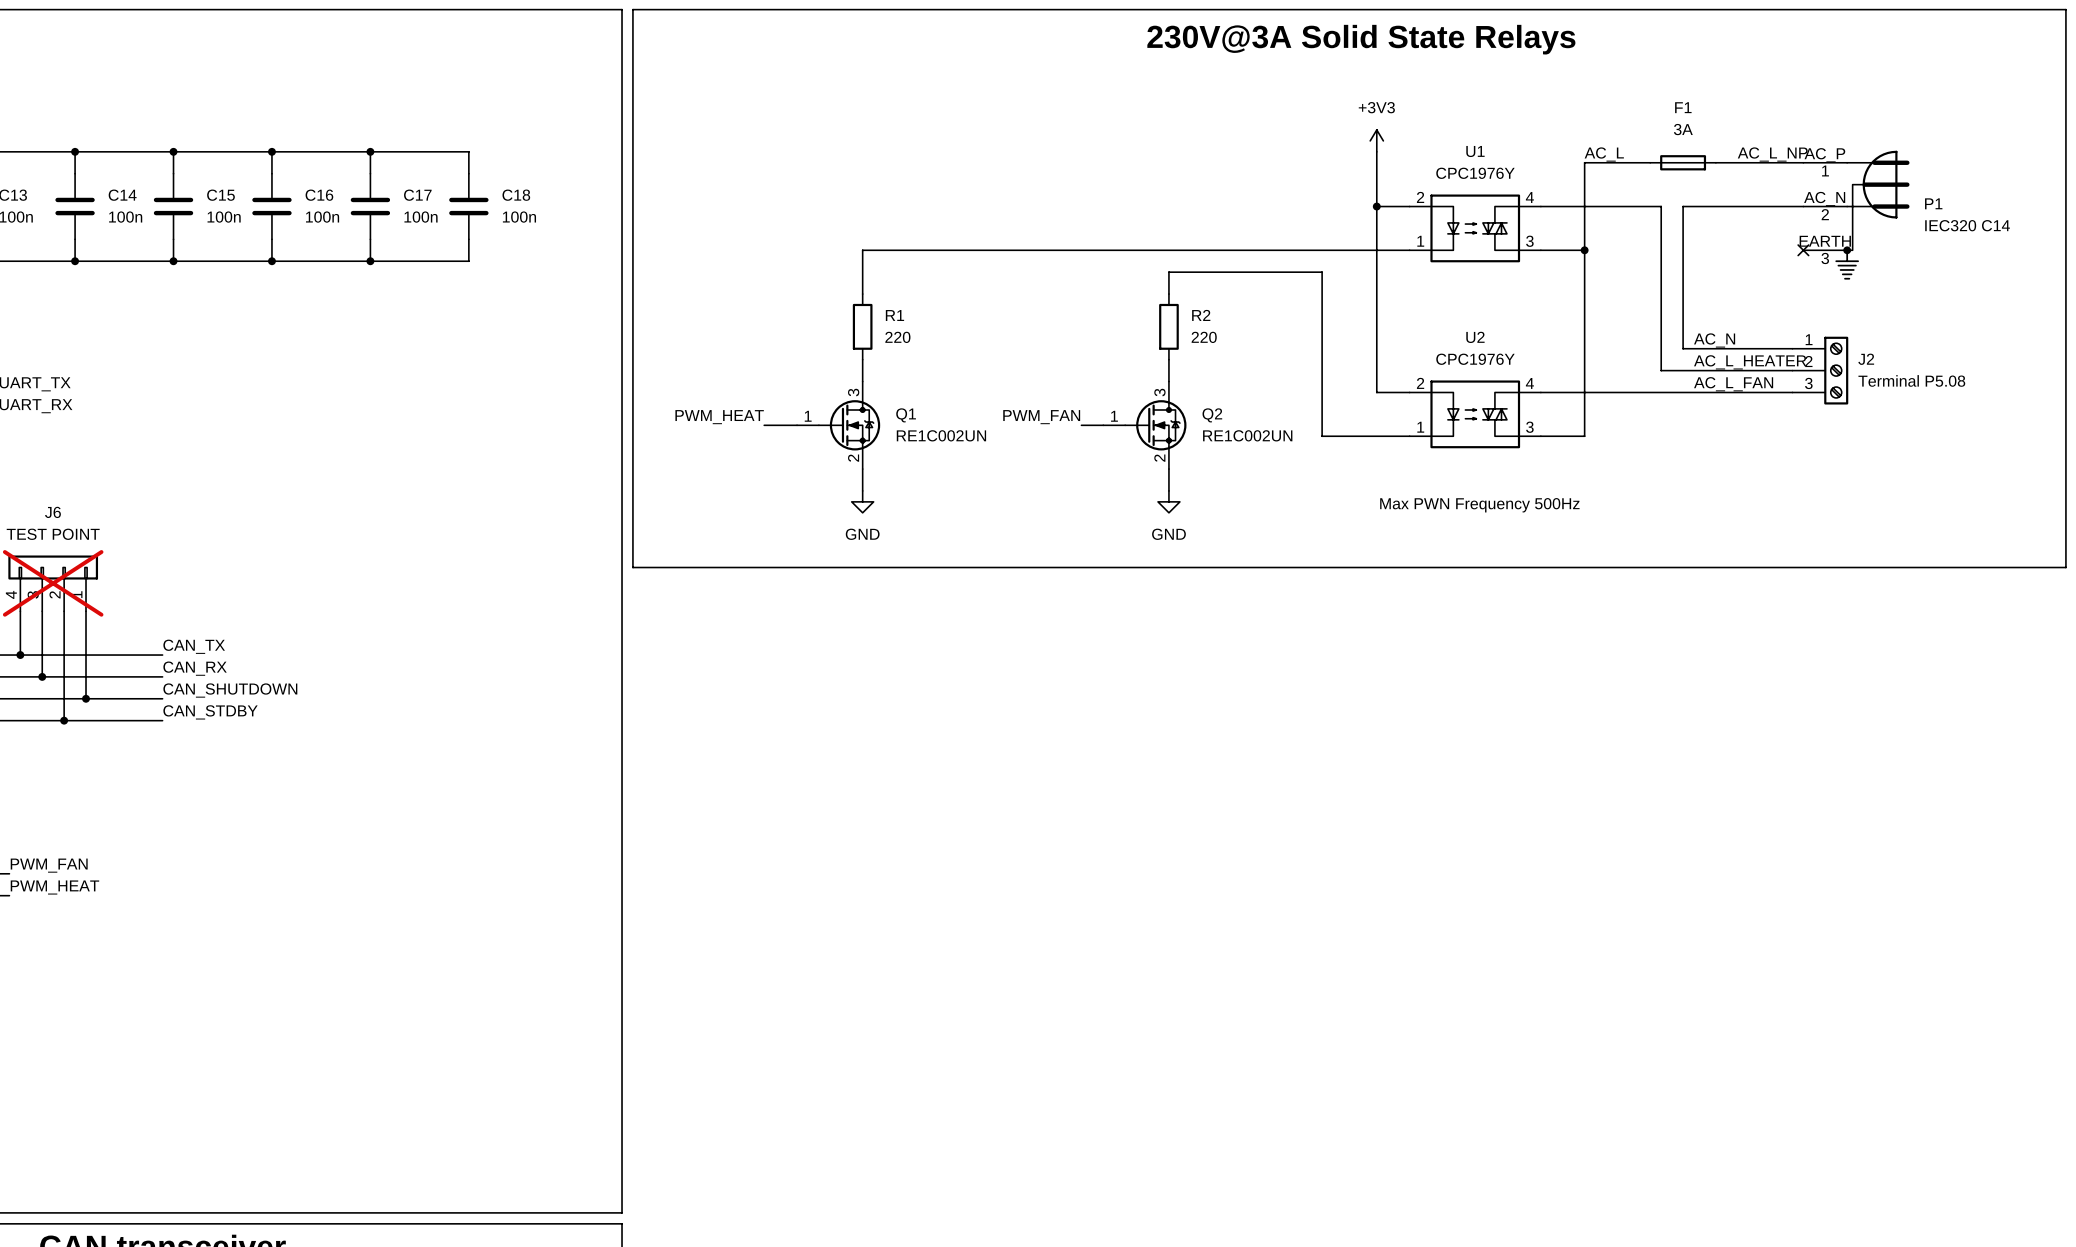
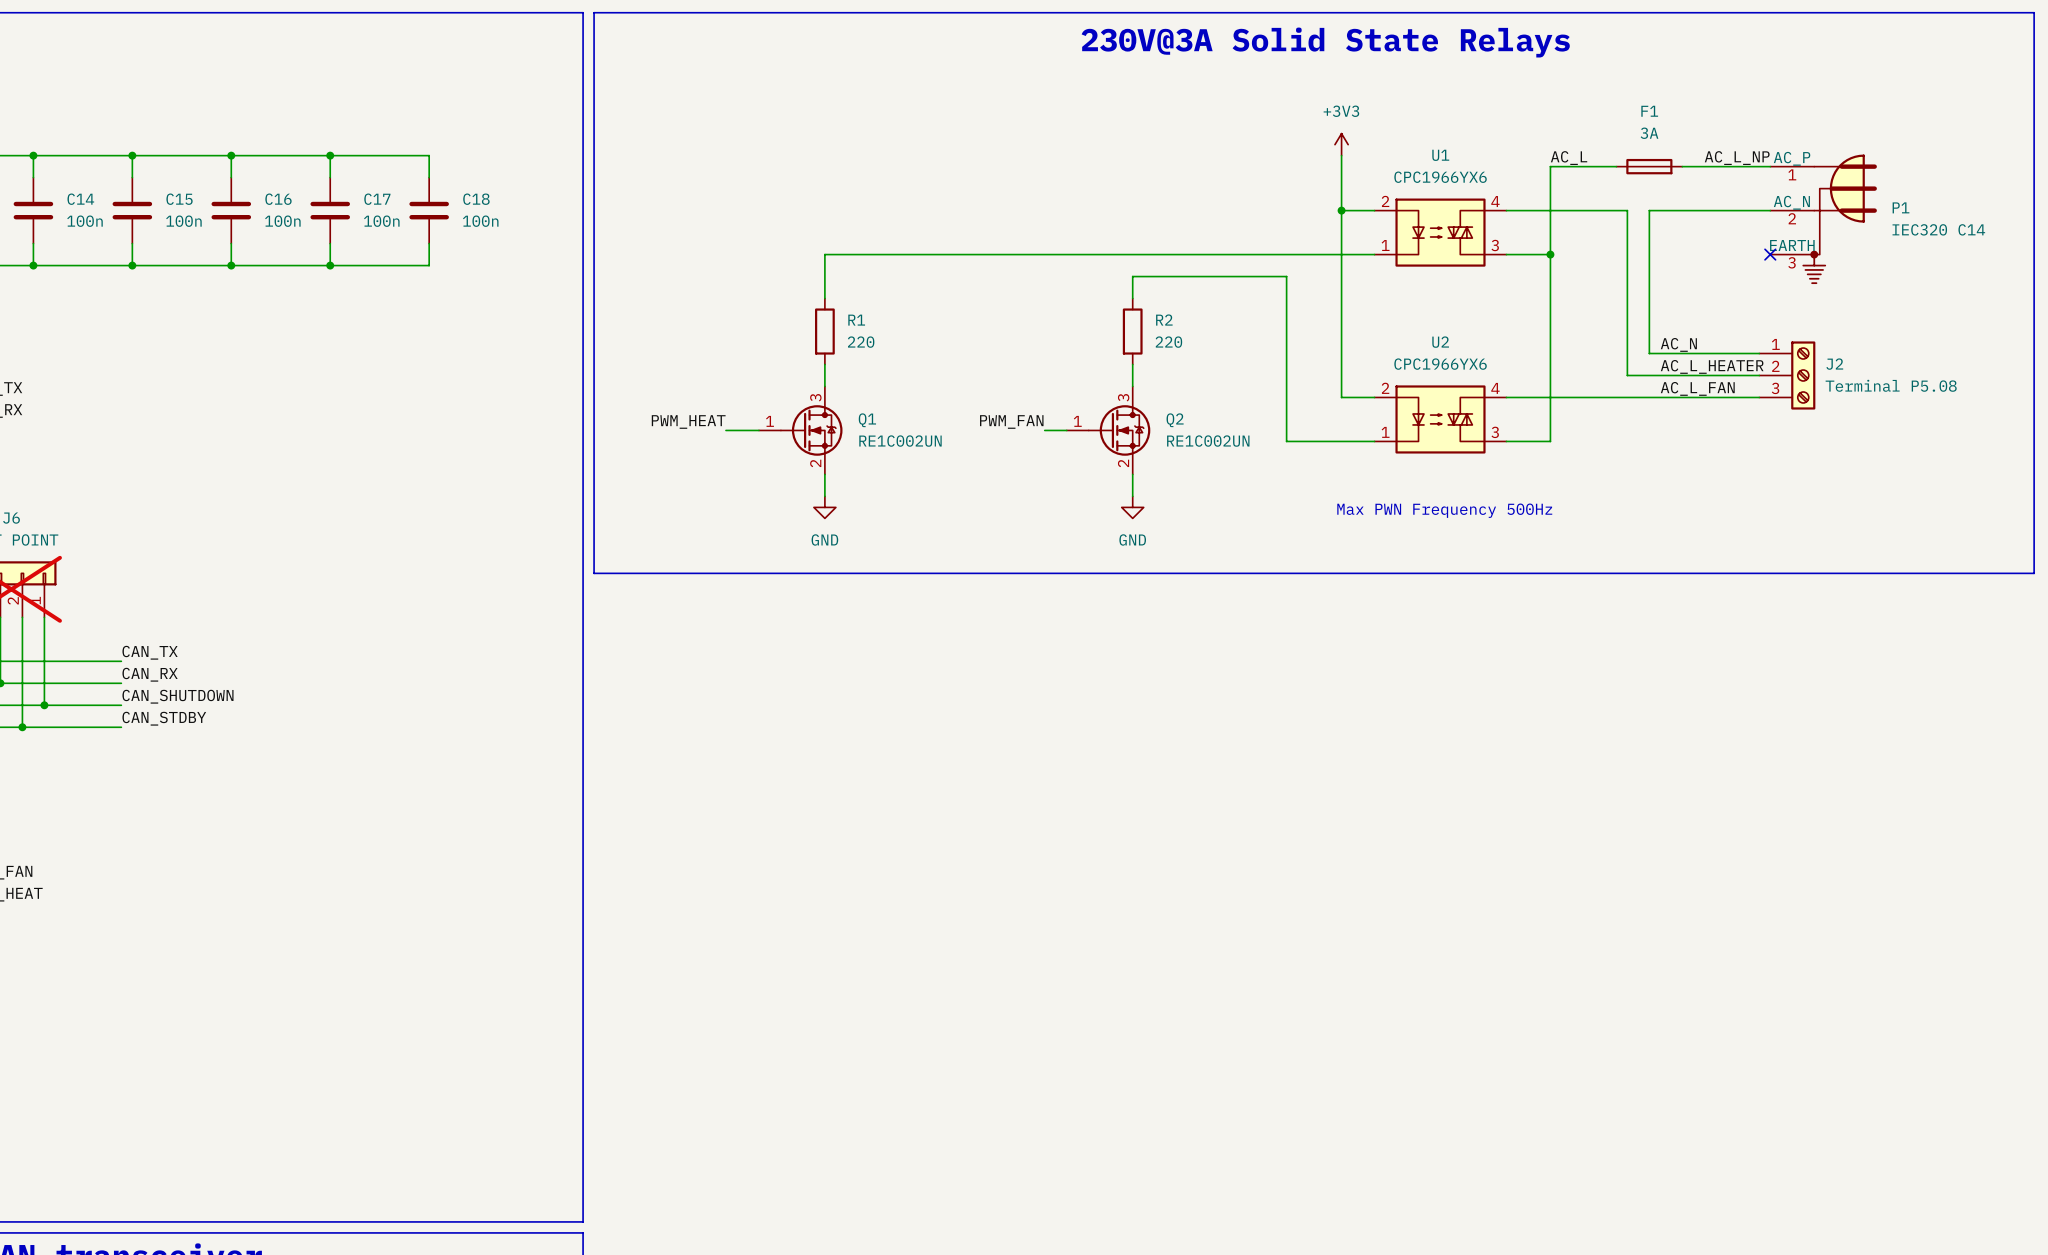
U1 value: CPC1976Y (1475, 173) -> CPC1966YX6 (1440, 177)
U2 value: CPC1976Y (1475, 359) -> CPC1966YX6 (1440, 364)

